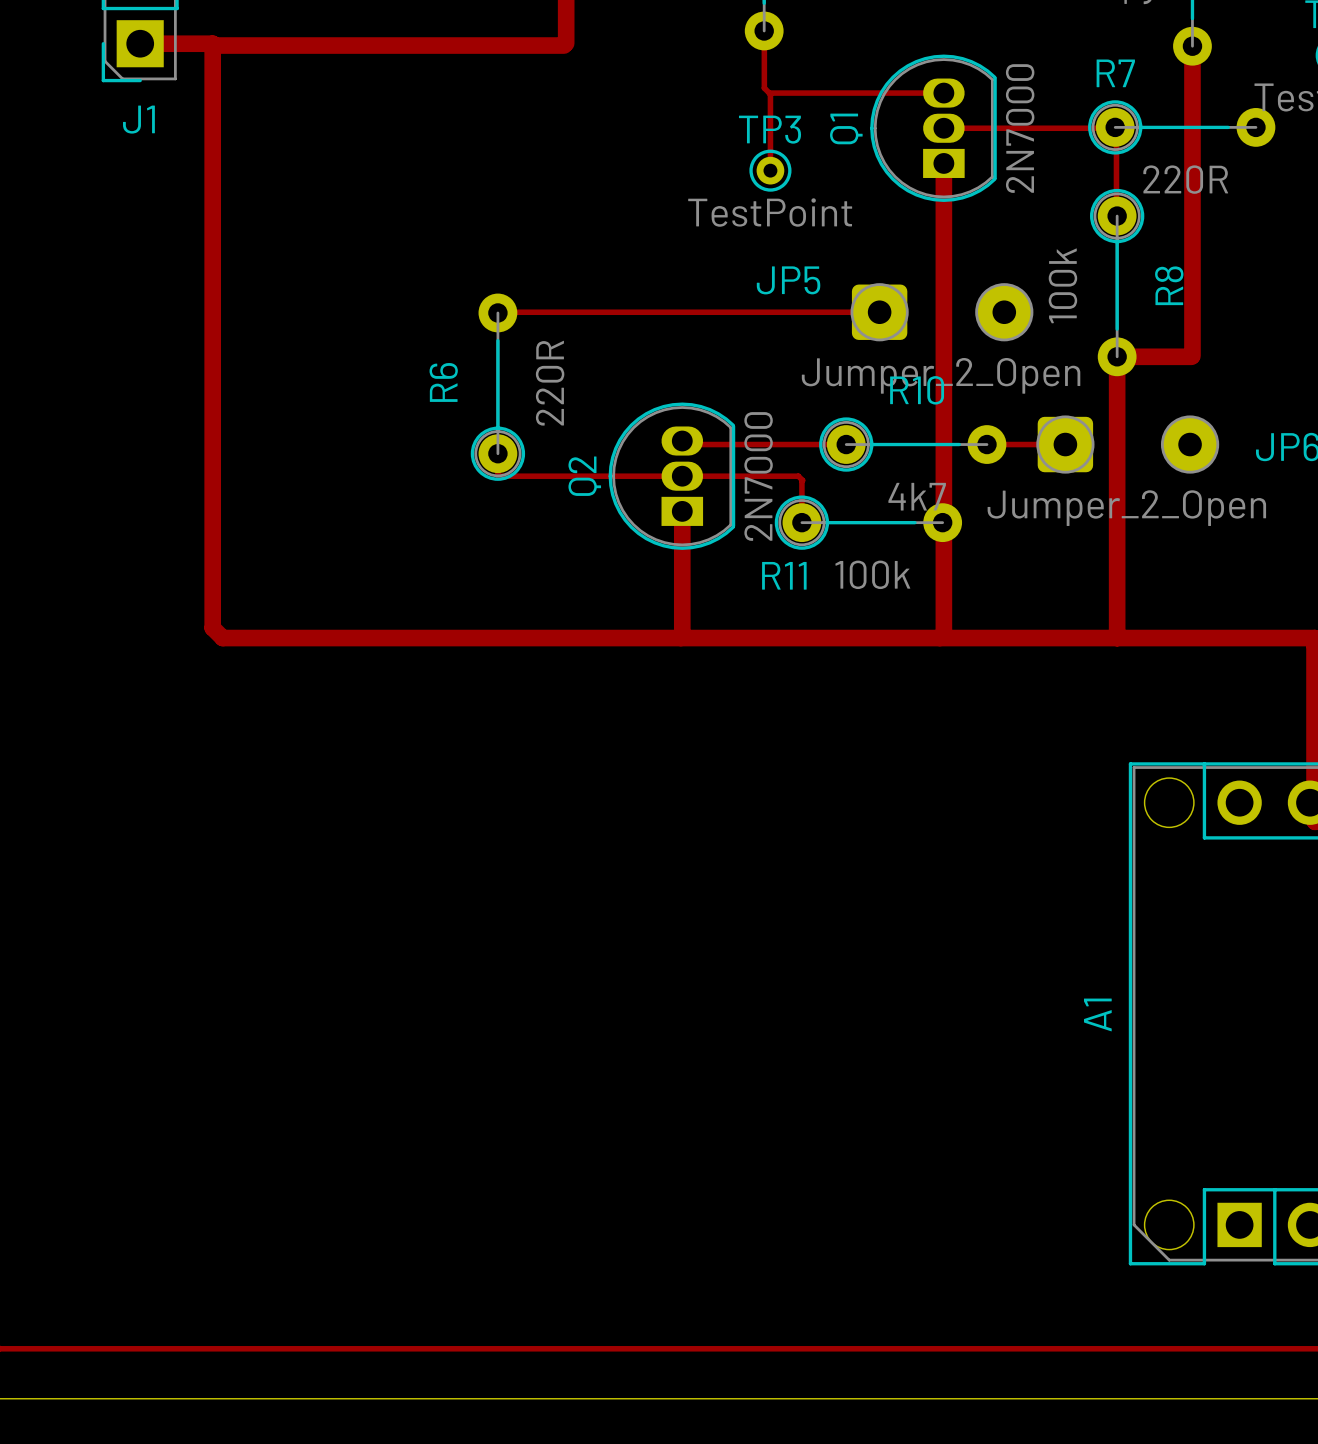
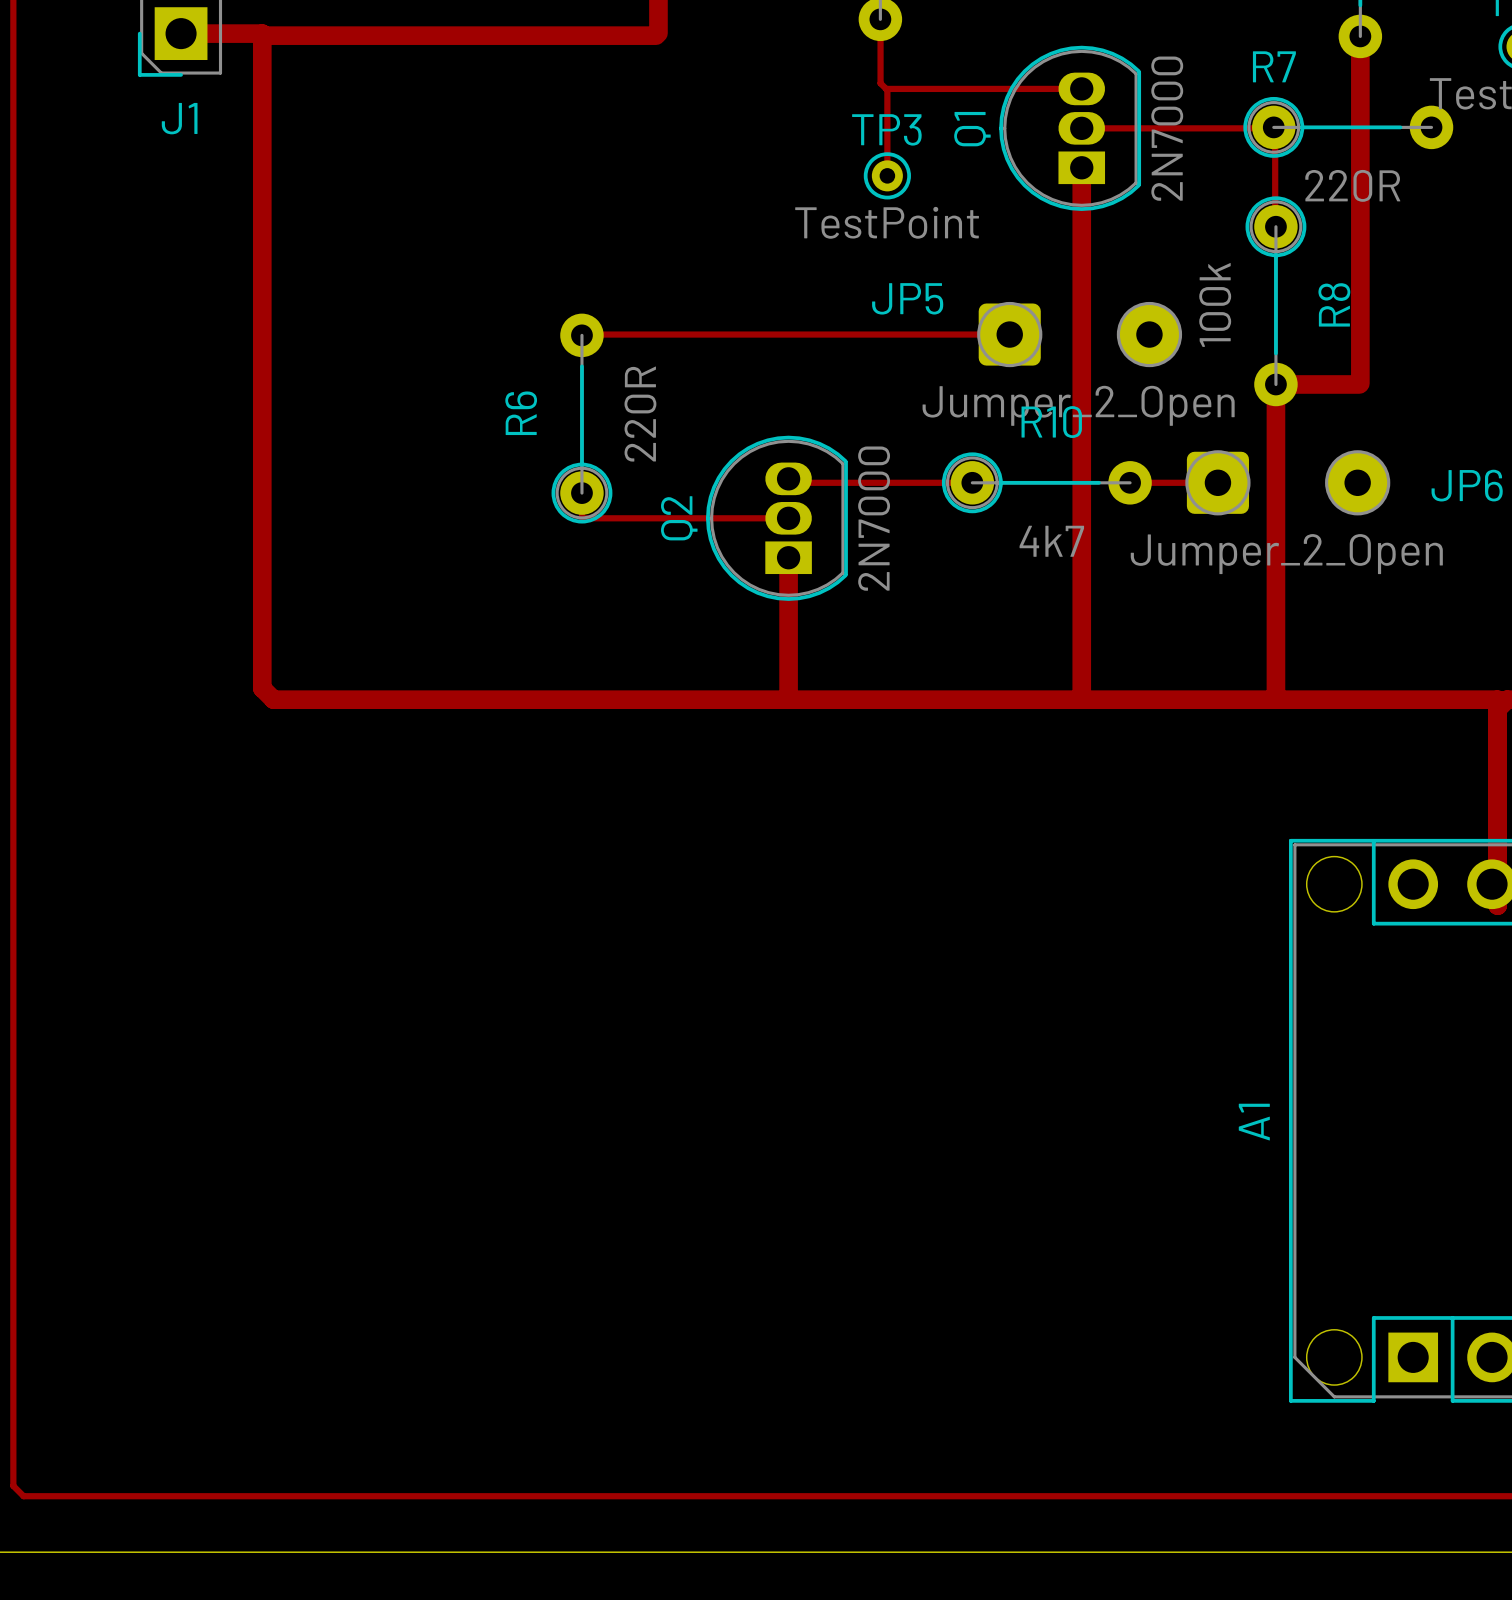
track: (682, 476) (798, 476) (802, 480) (801, 522) -> none
R11: 100k (868, 522) -> none

